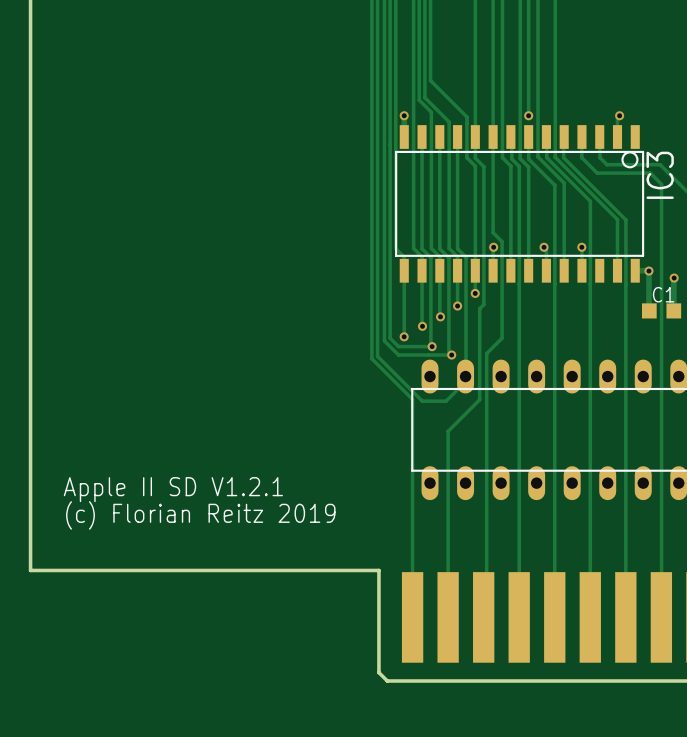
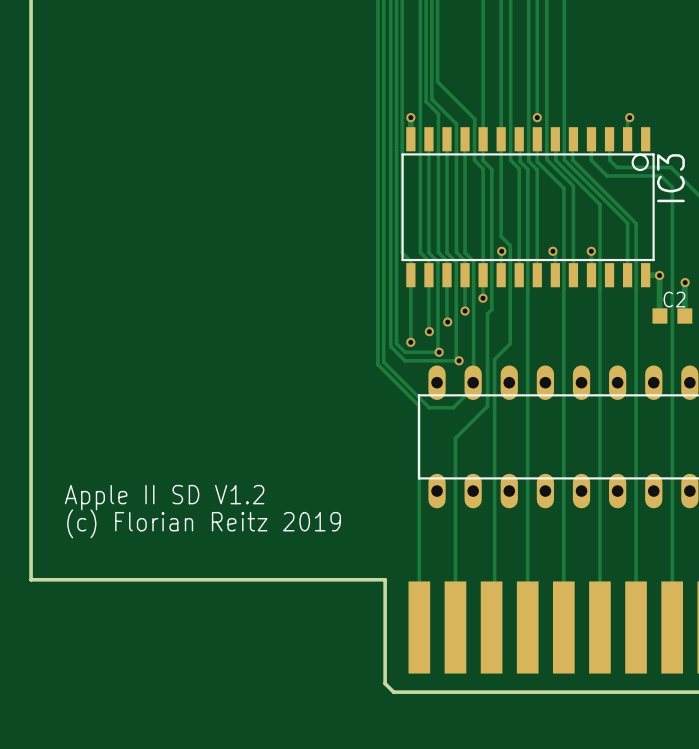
C1 name: C1 (663, 294) -> C2 (674, 299)
text: Apple II SD V1.2.1 (173, 489) -> Apple II SD V1.2 (164, 497)

